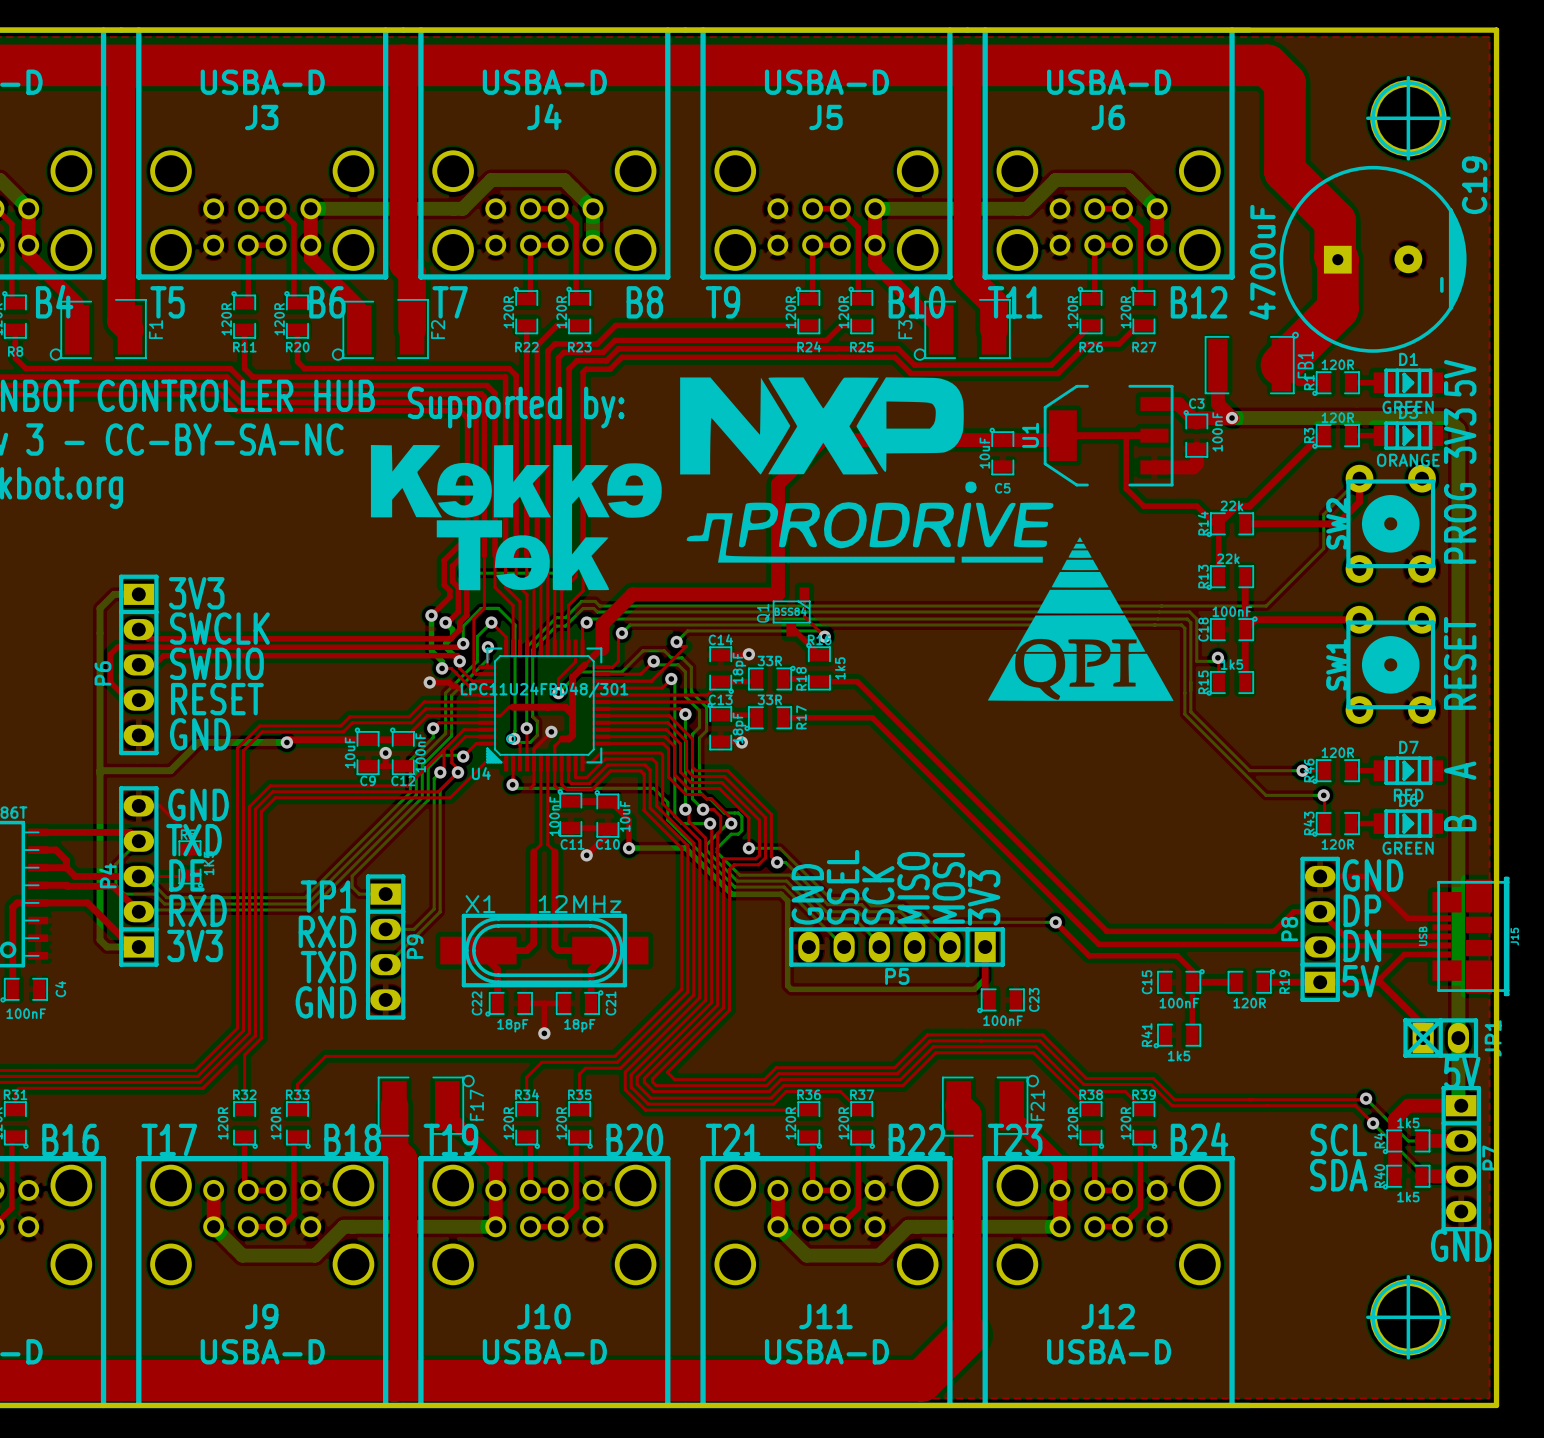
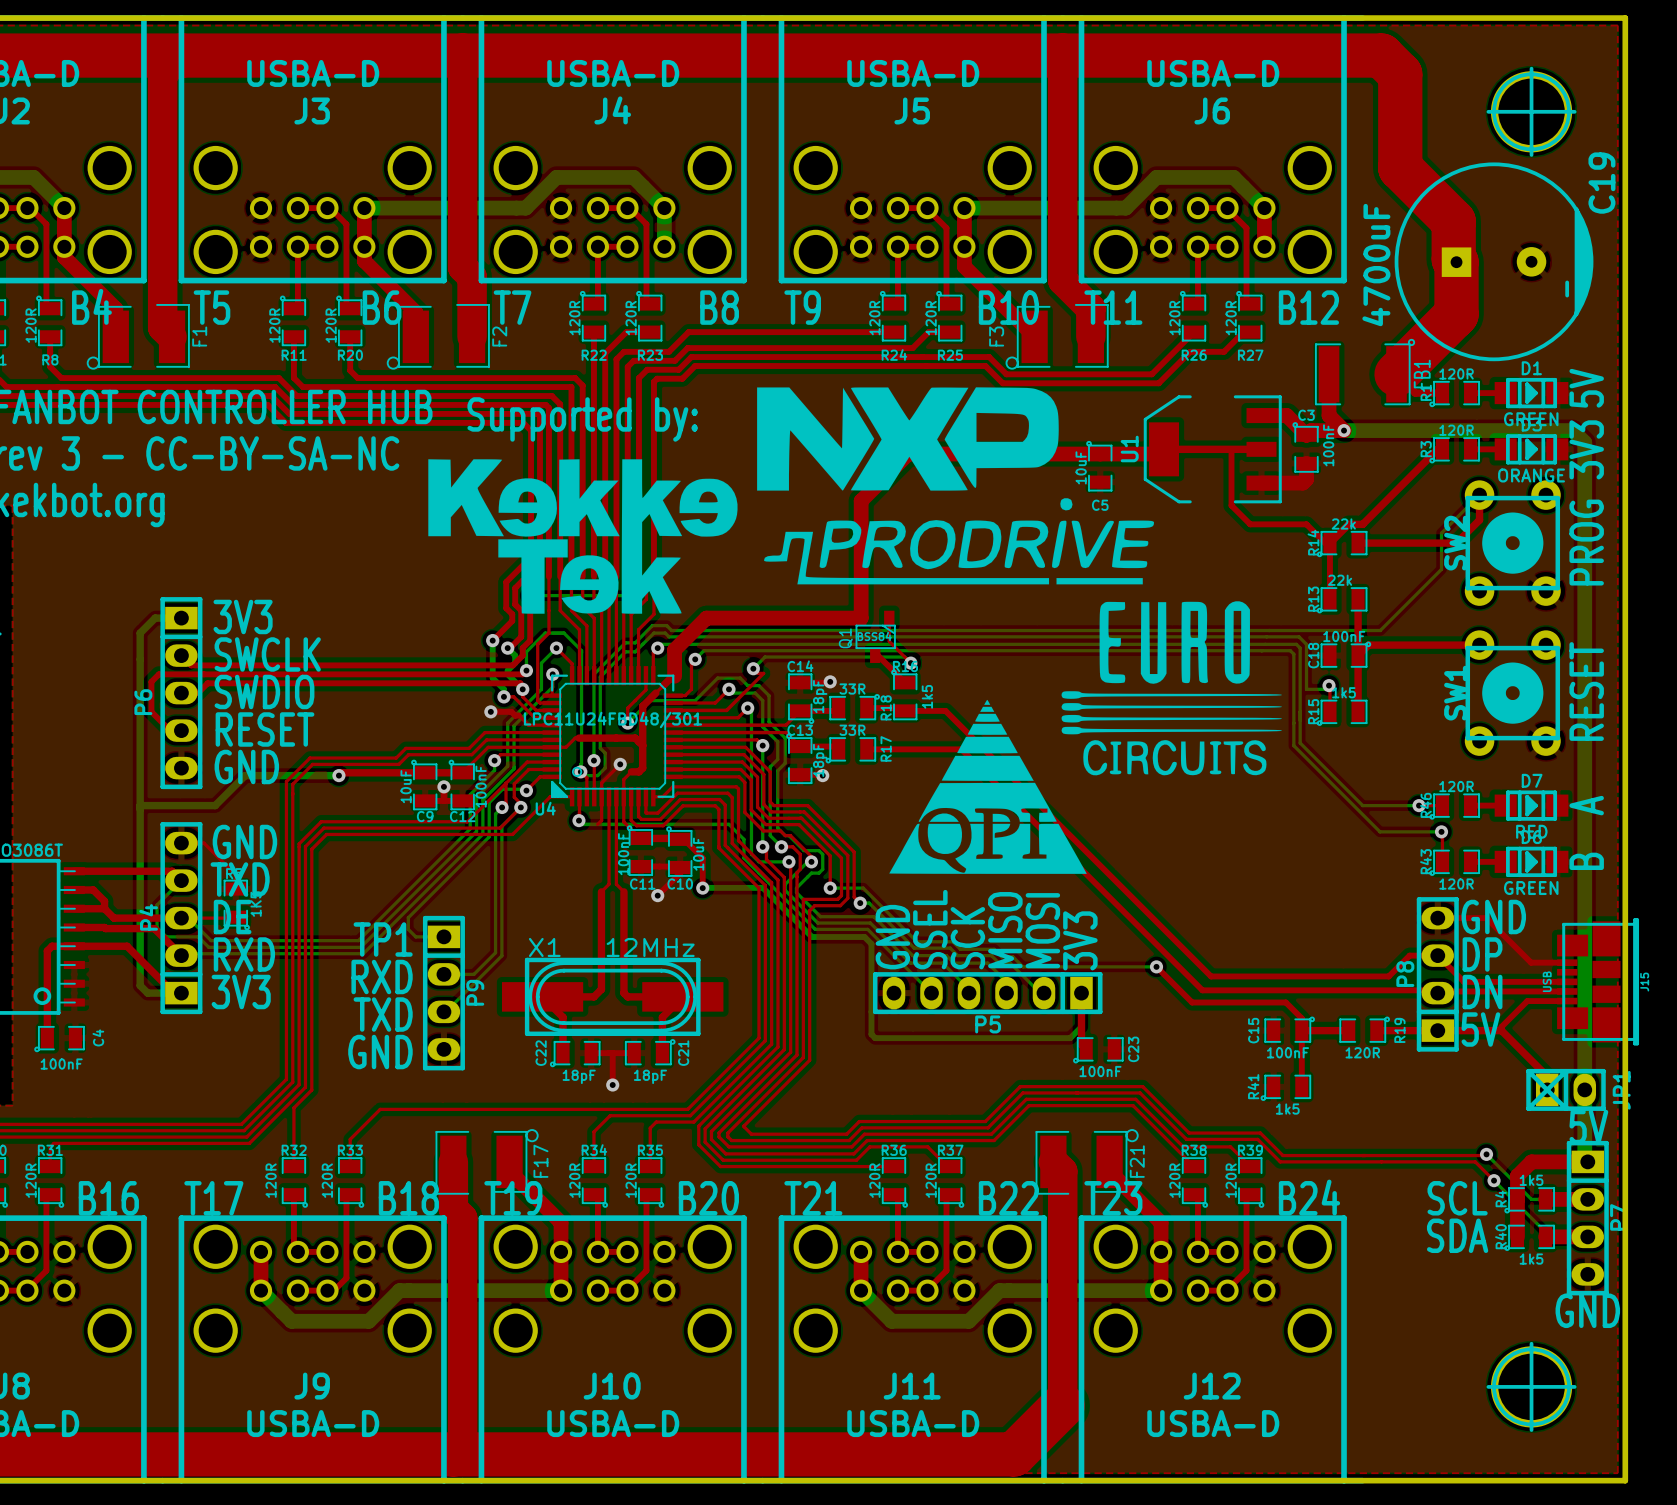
drawing: none -> [1061, 601, 1282, 776]
drawing position: (1080, 619) -> (988, 786)

